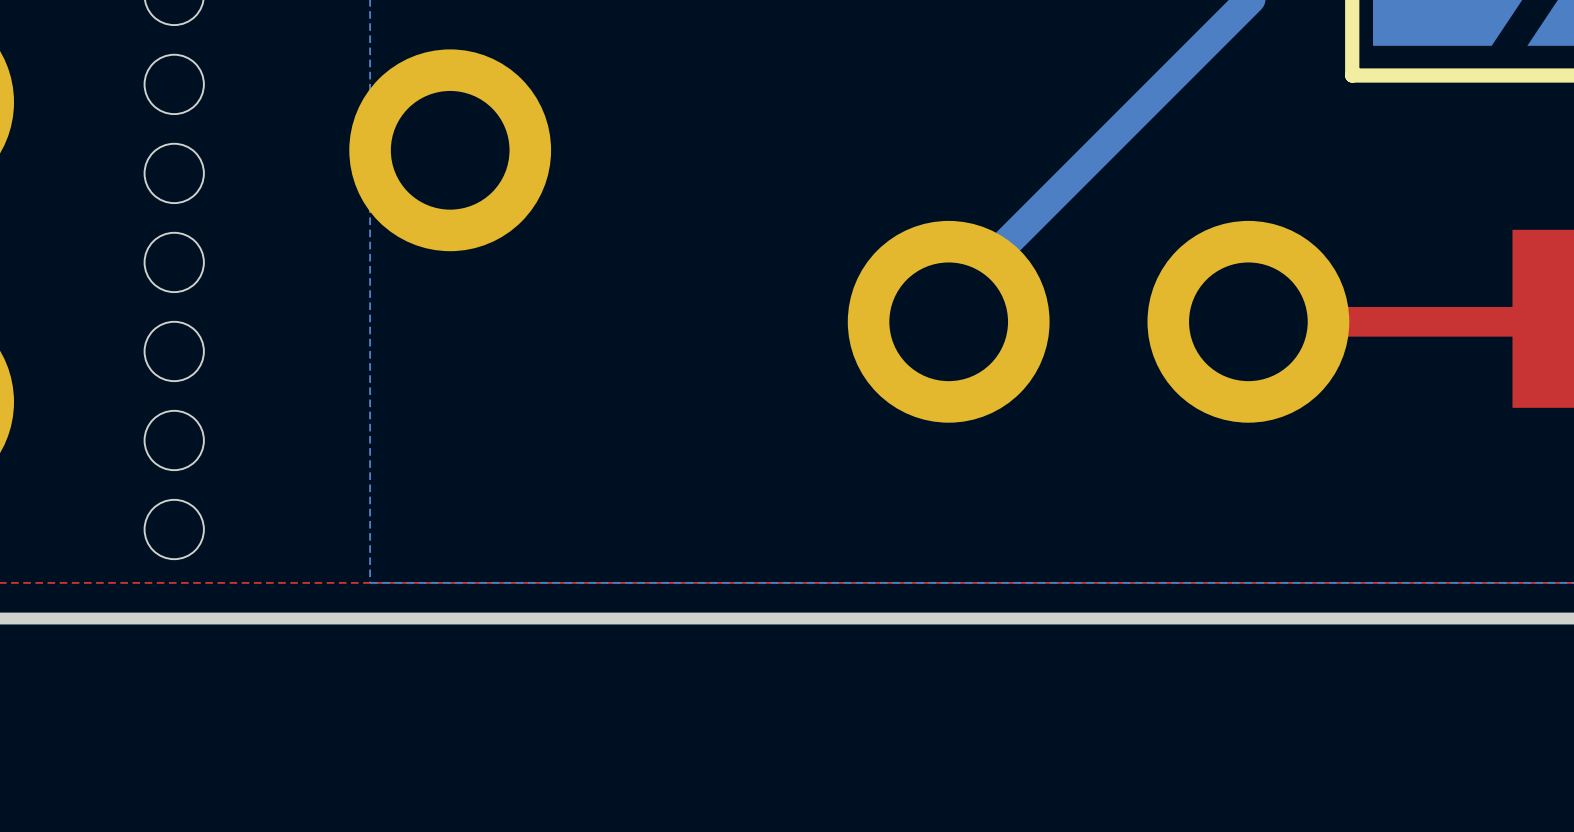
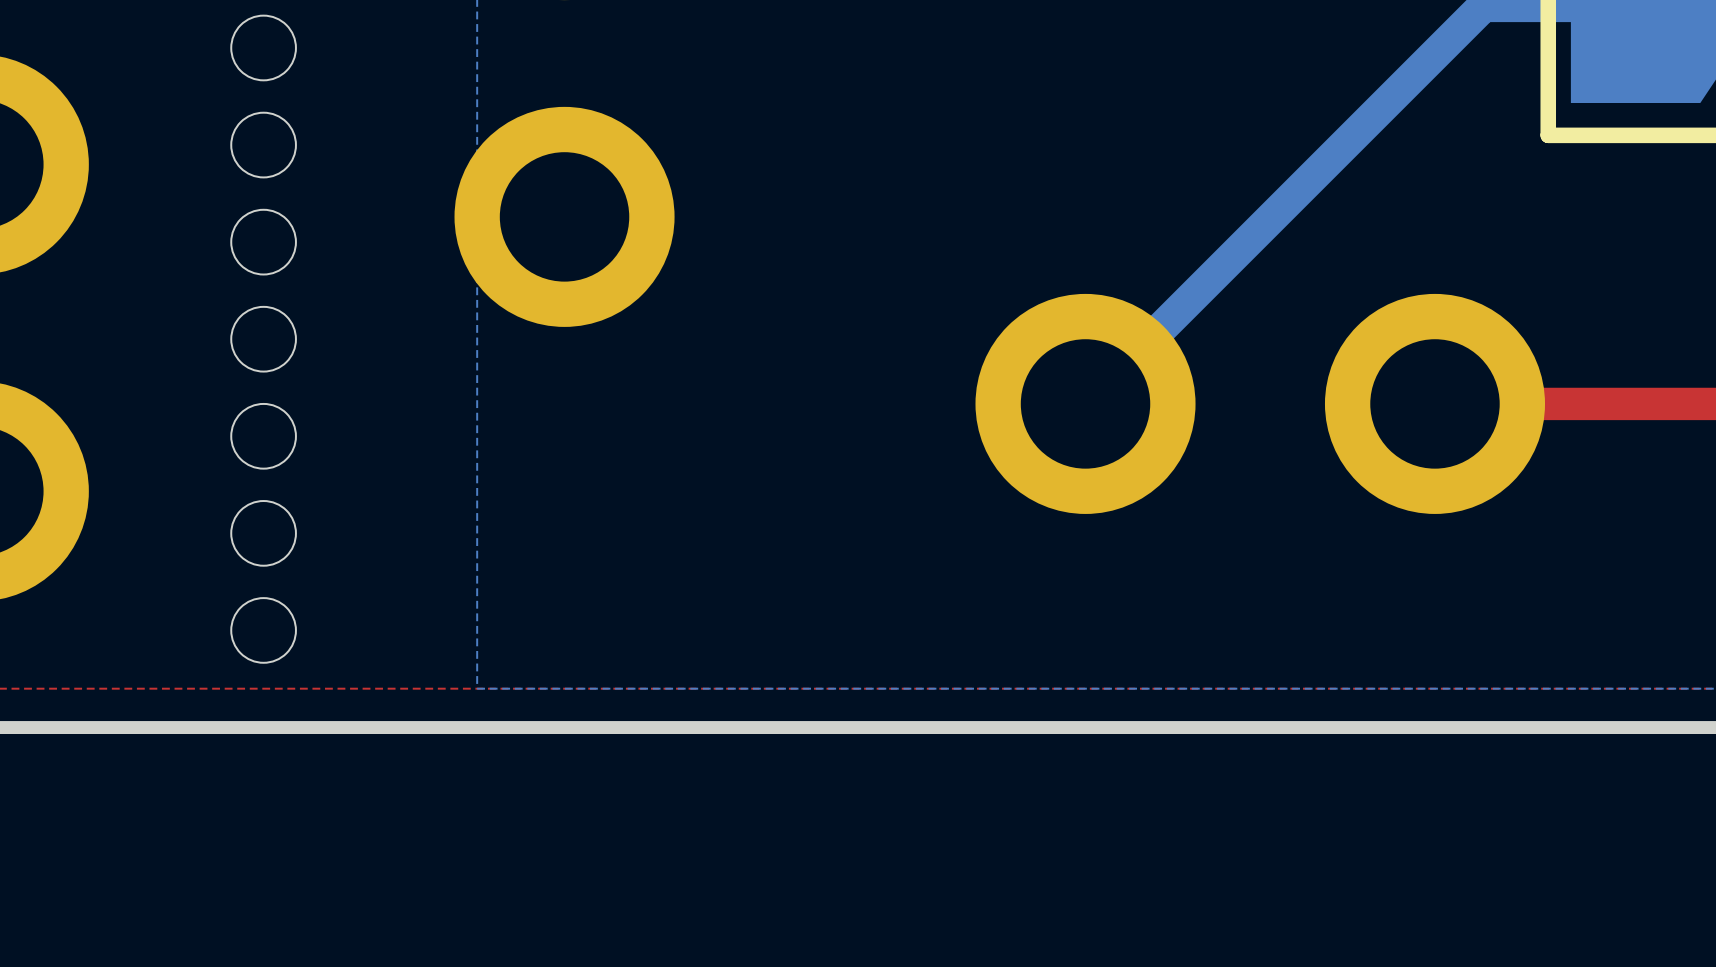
part position: (948, 321) -> (1085, 403)

